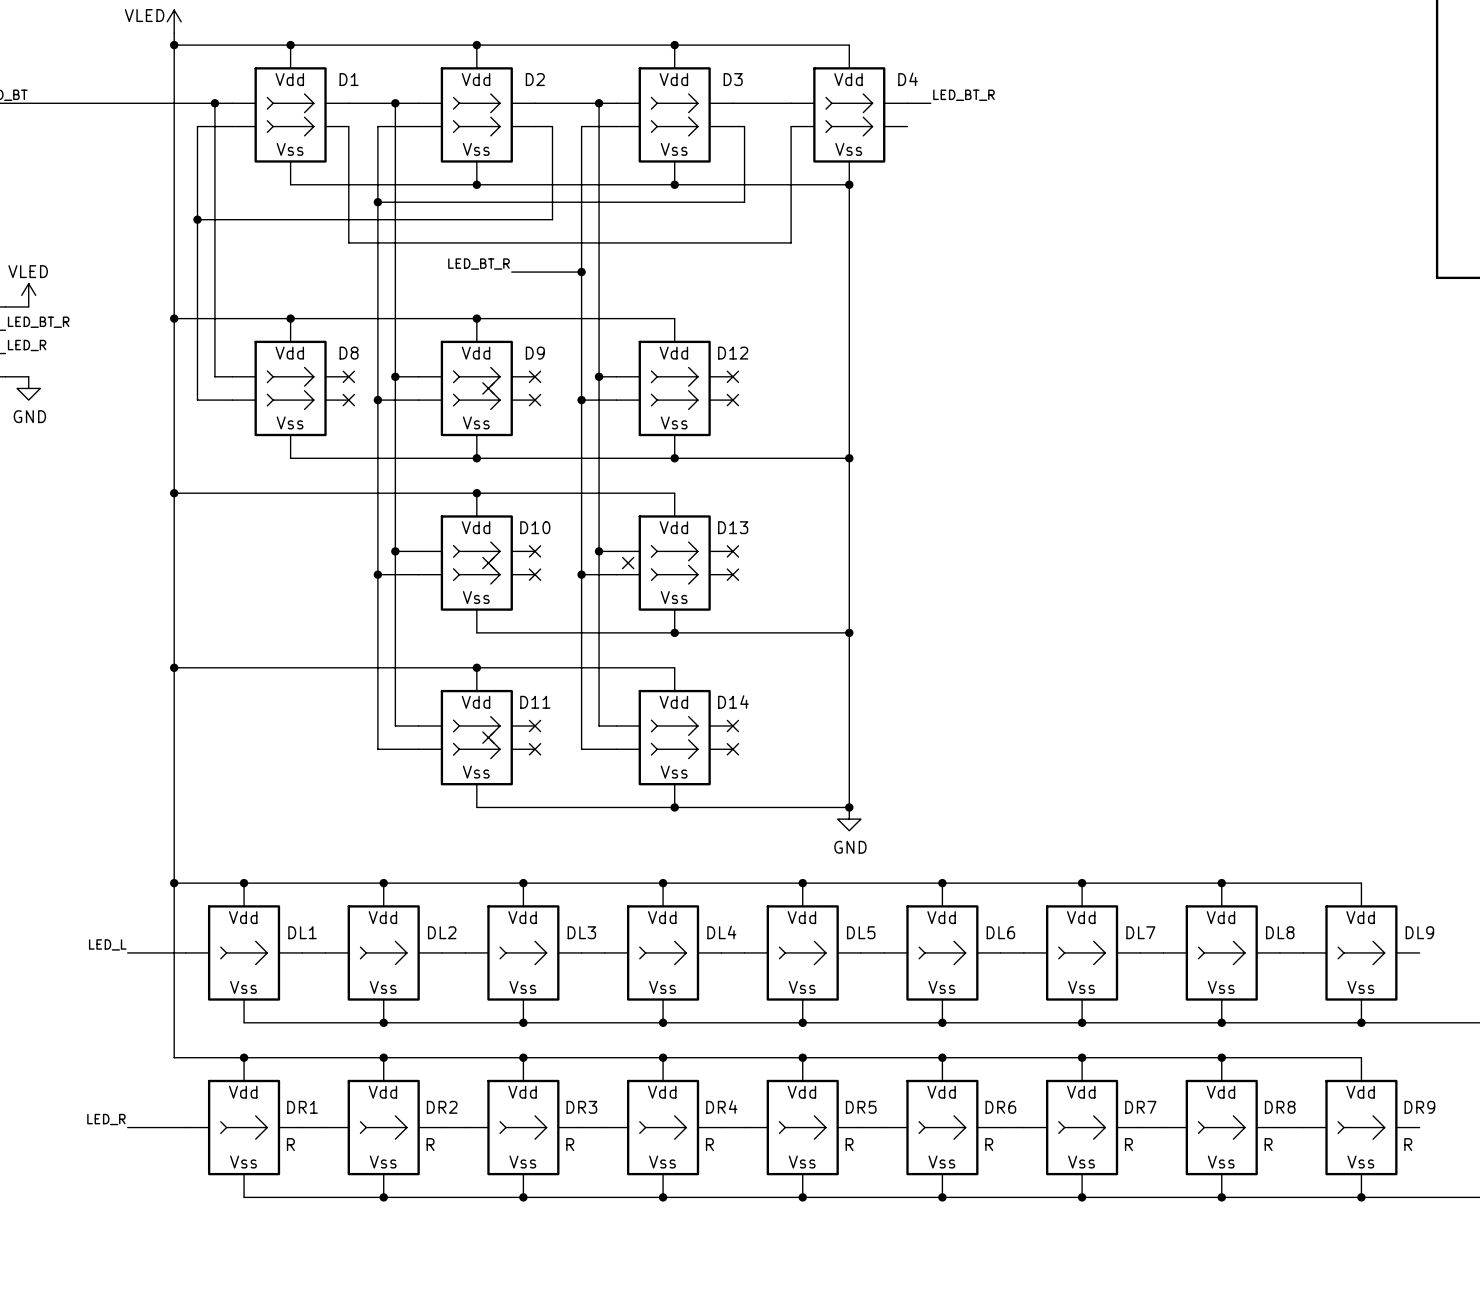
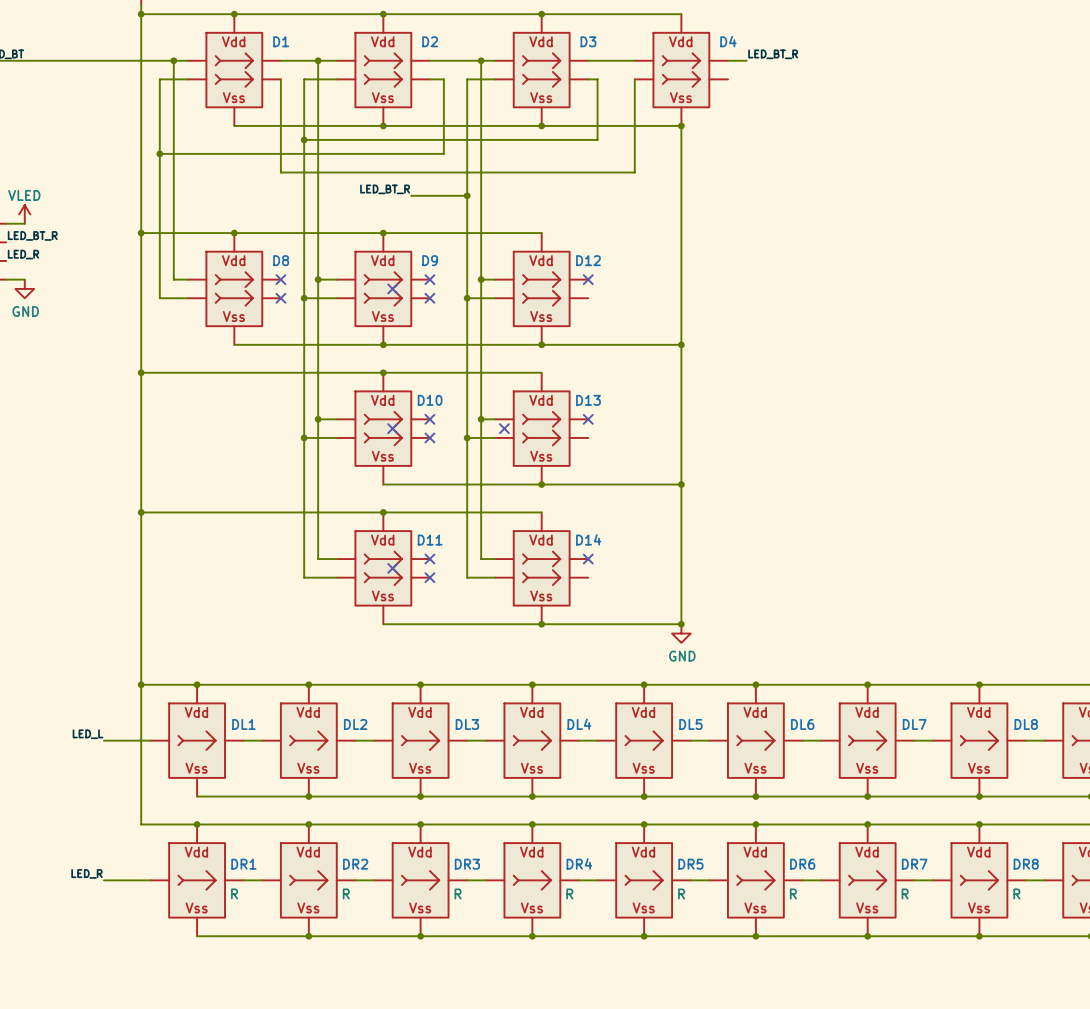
no-connect mark: (732, 400) -> none
no-connect mark: (732, 574) -> none
no-connect mark: (732, 749) -> none

